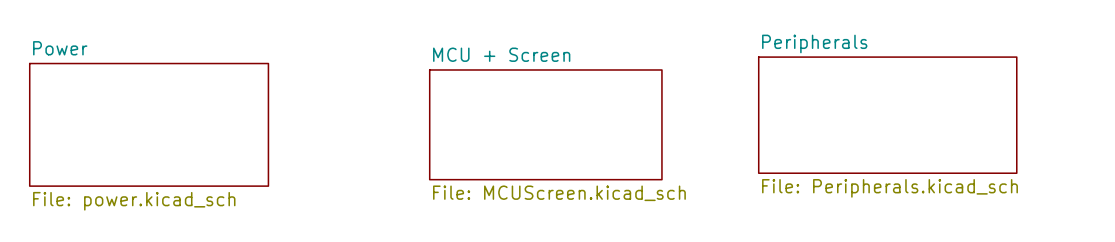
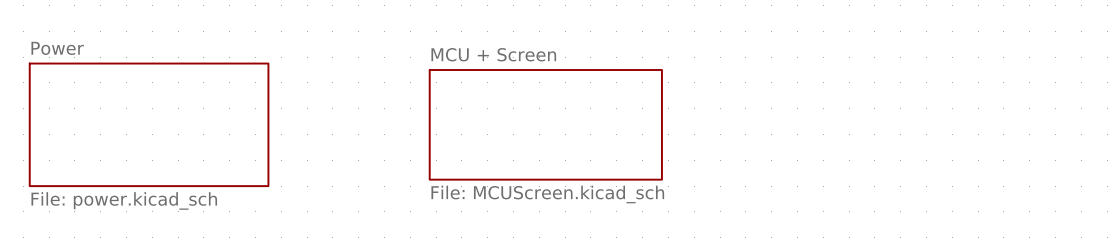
sheet Peripherals: File: Peripherals.kicad_sch (887, 115) -> none

